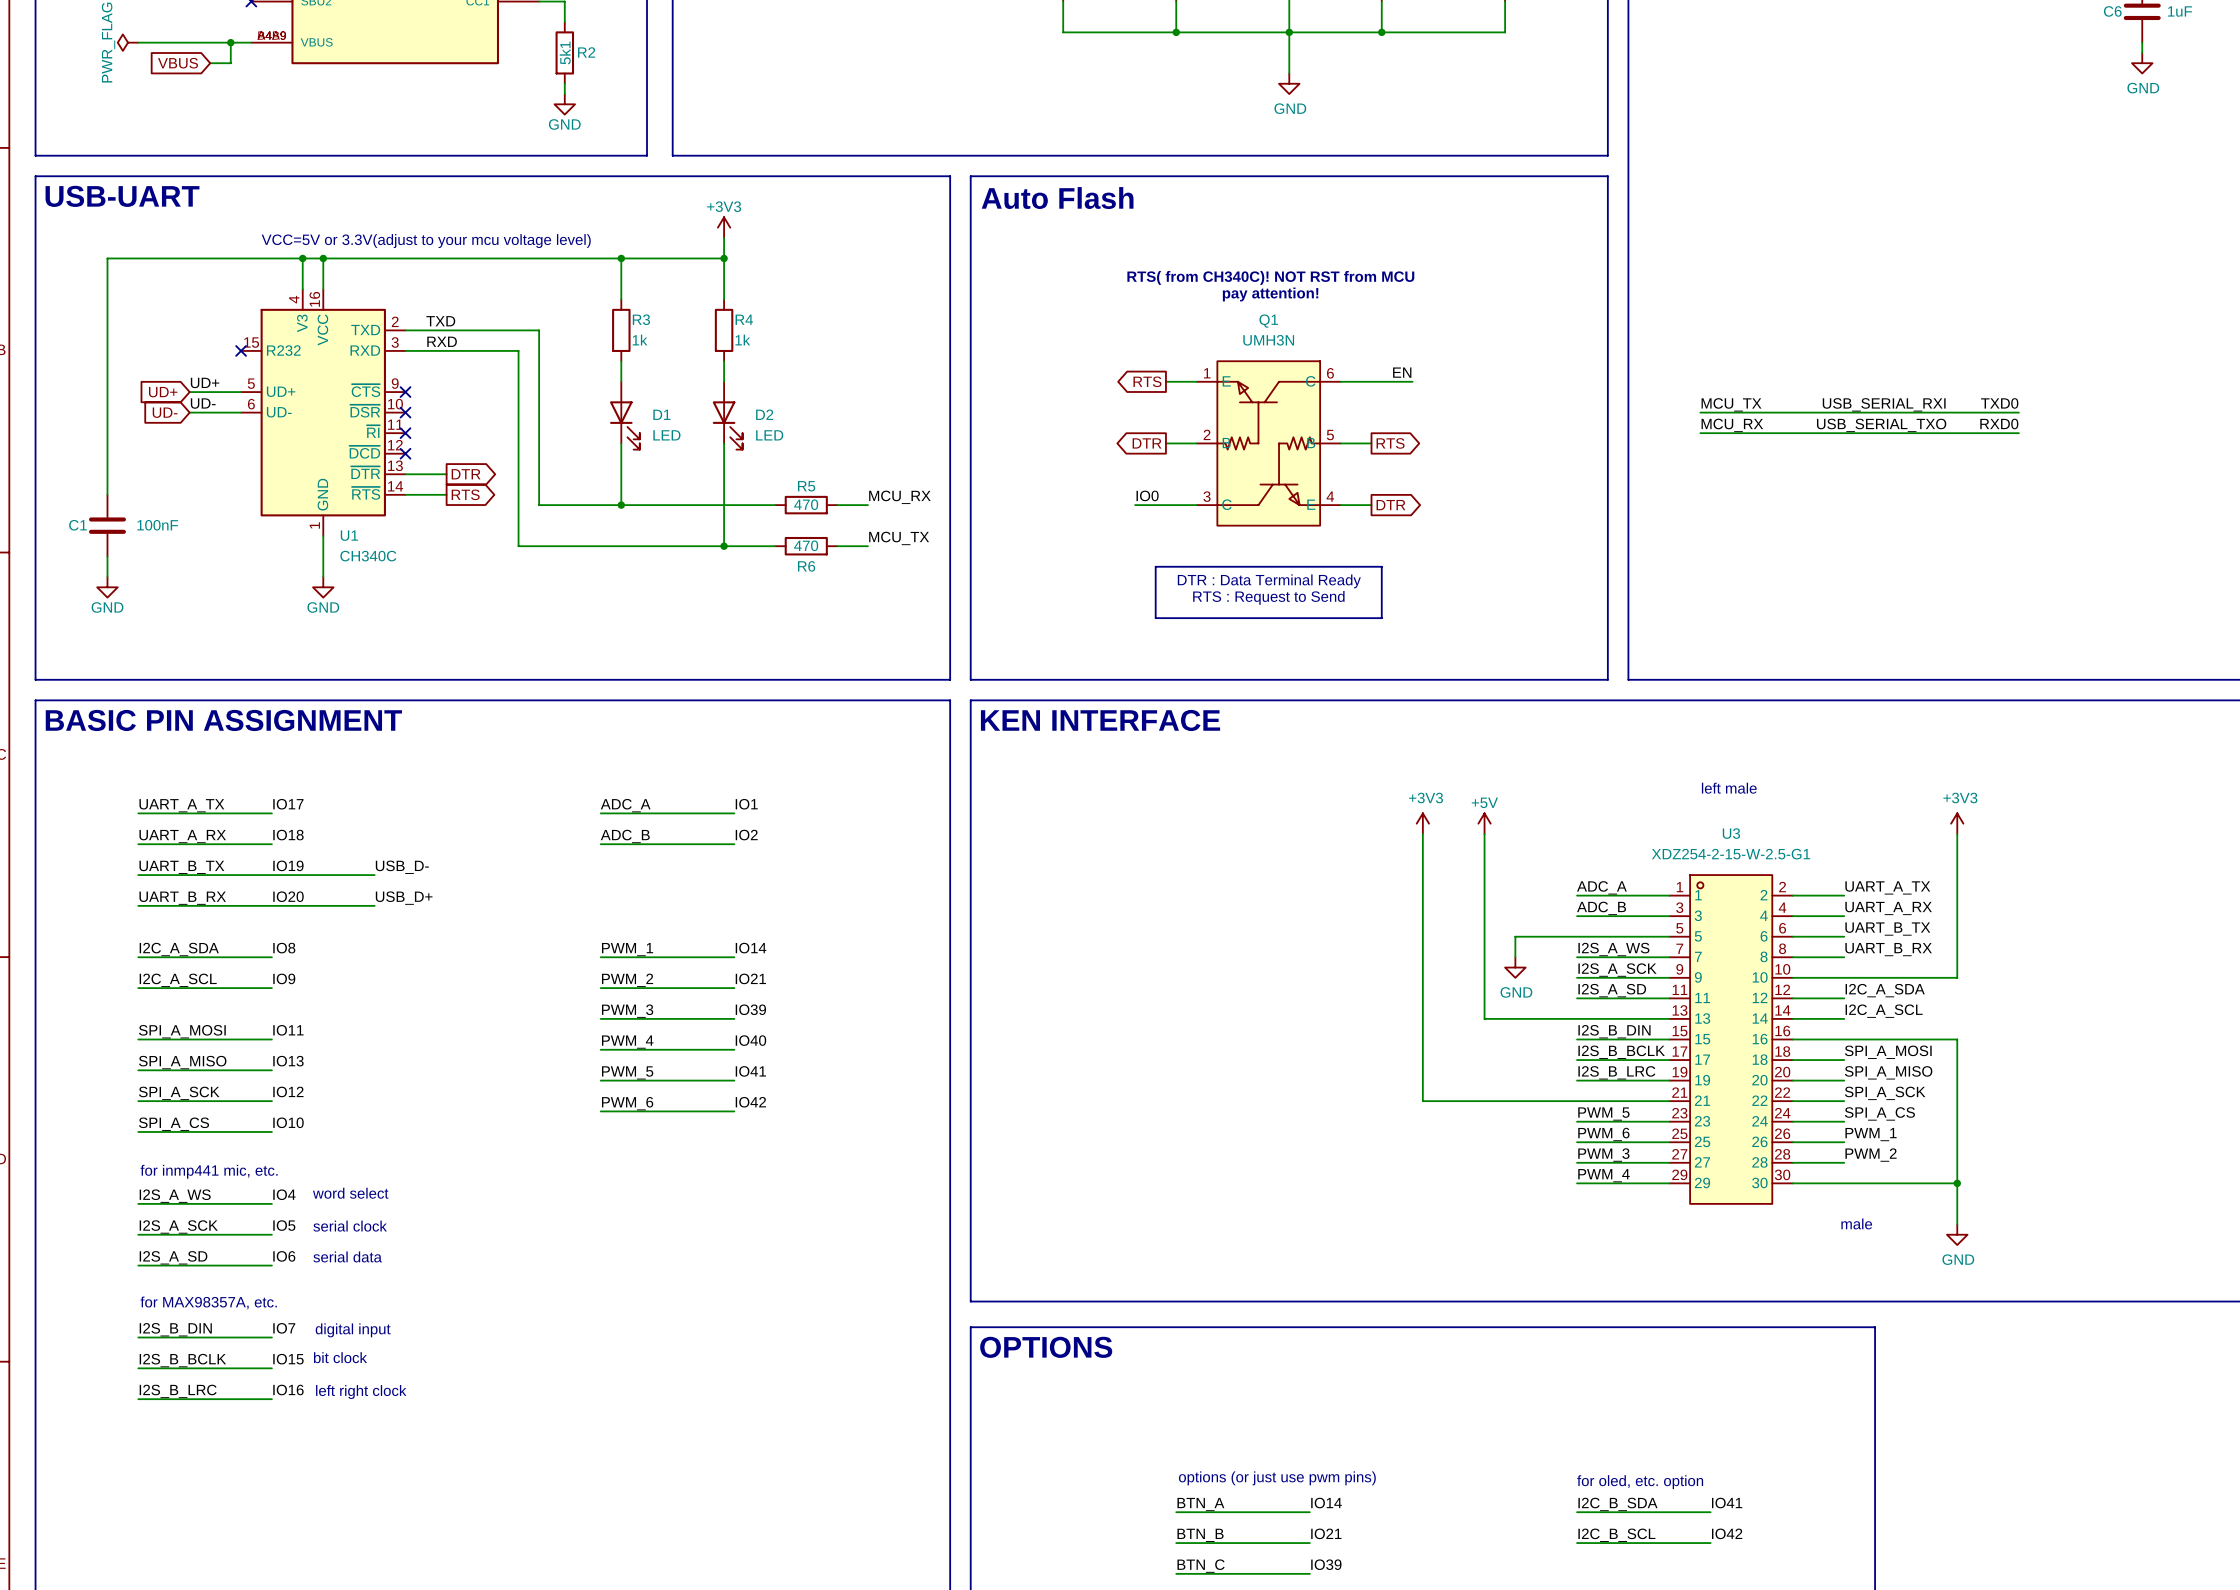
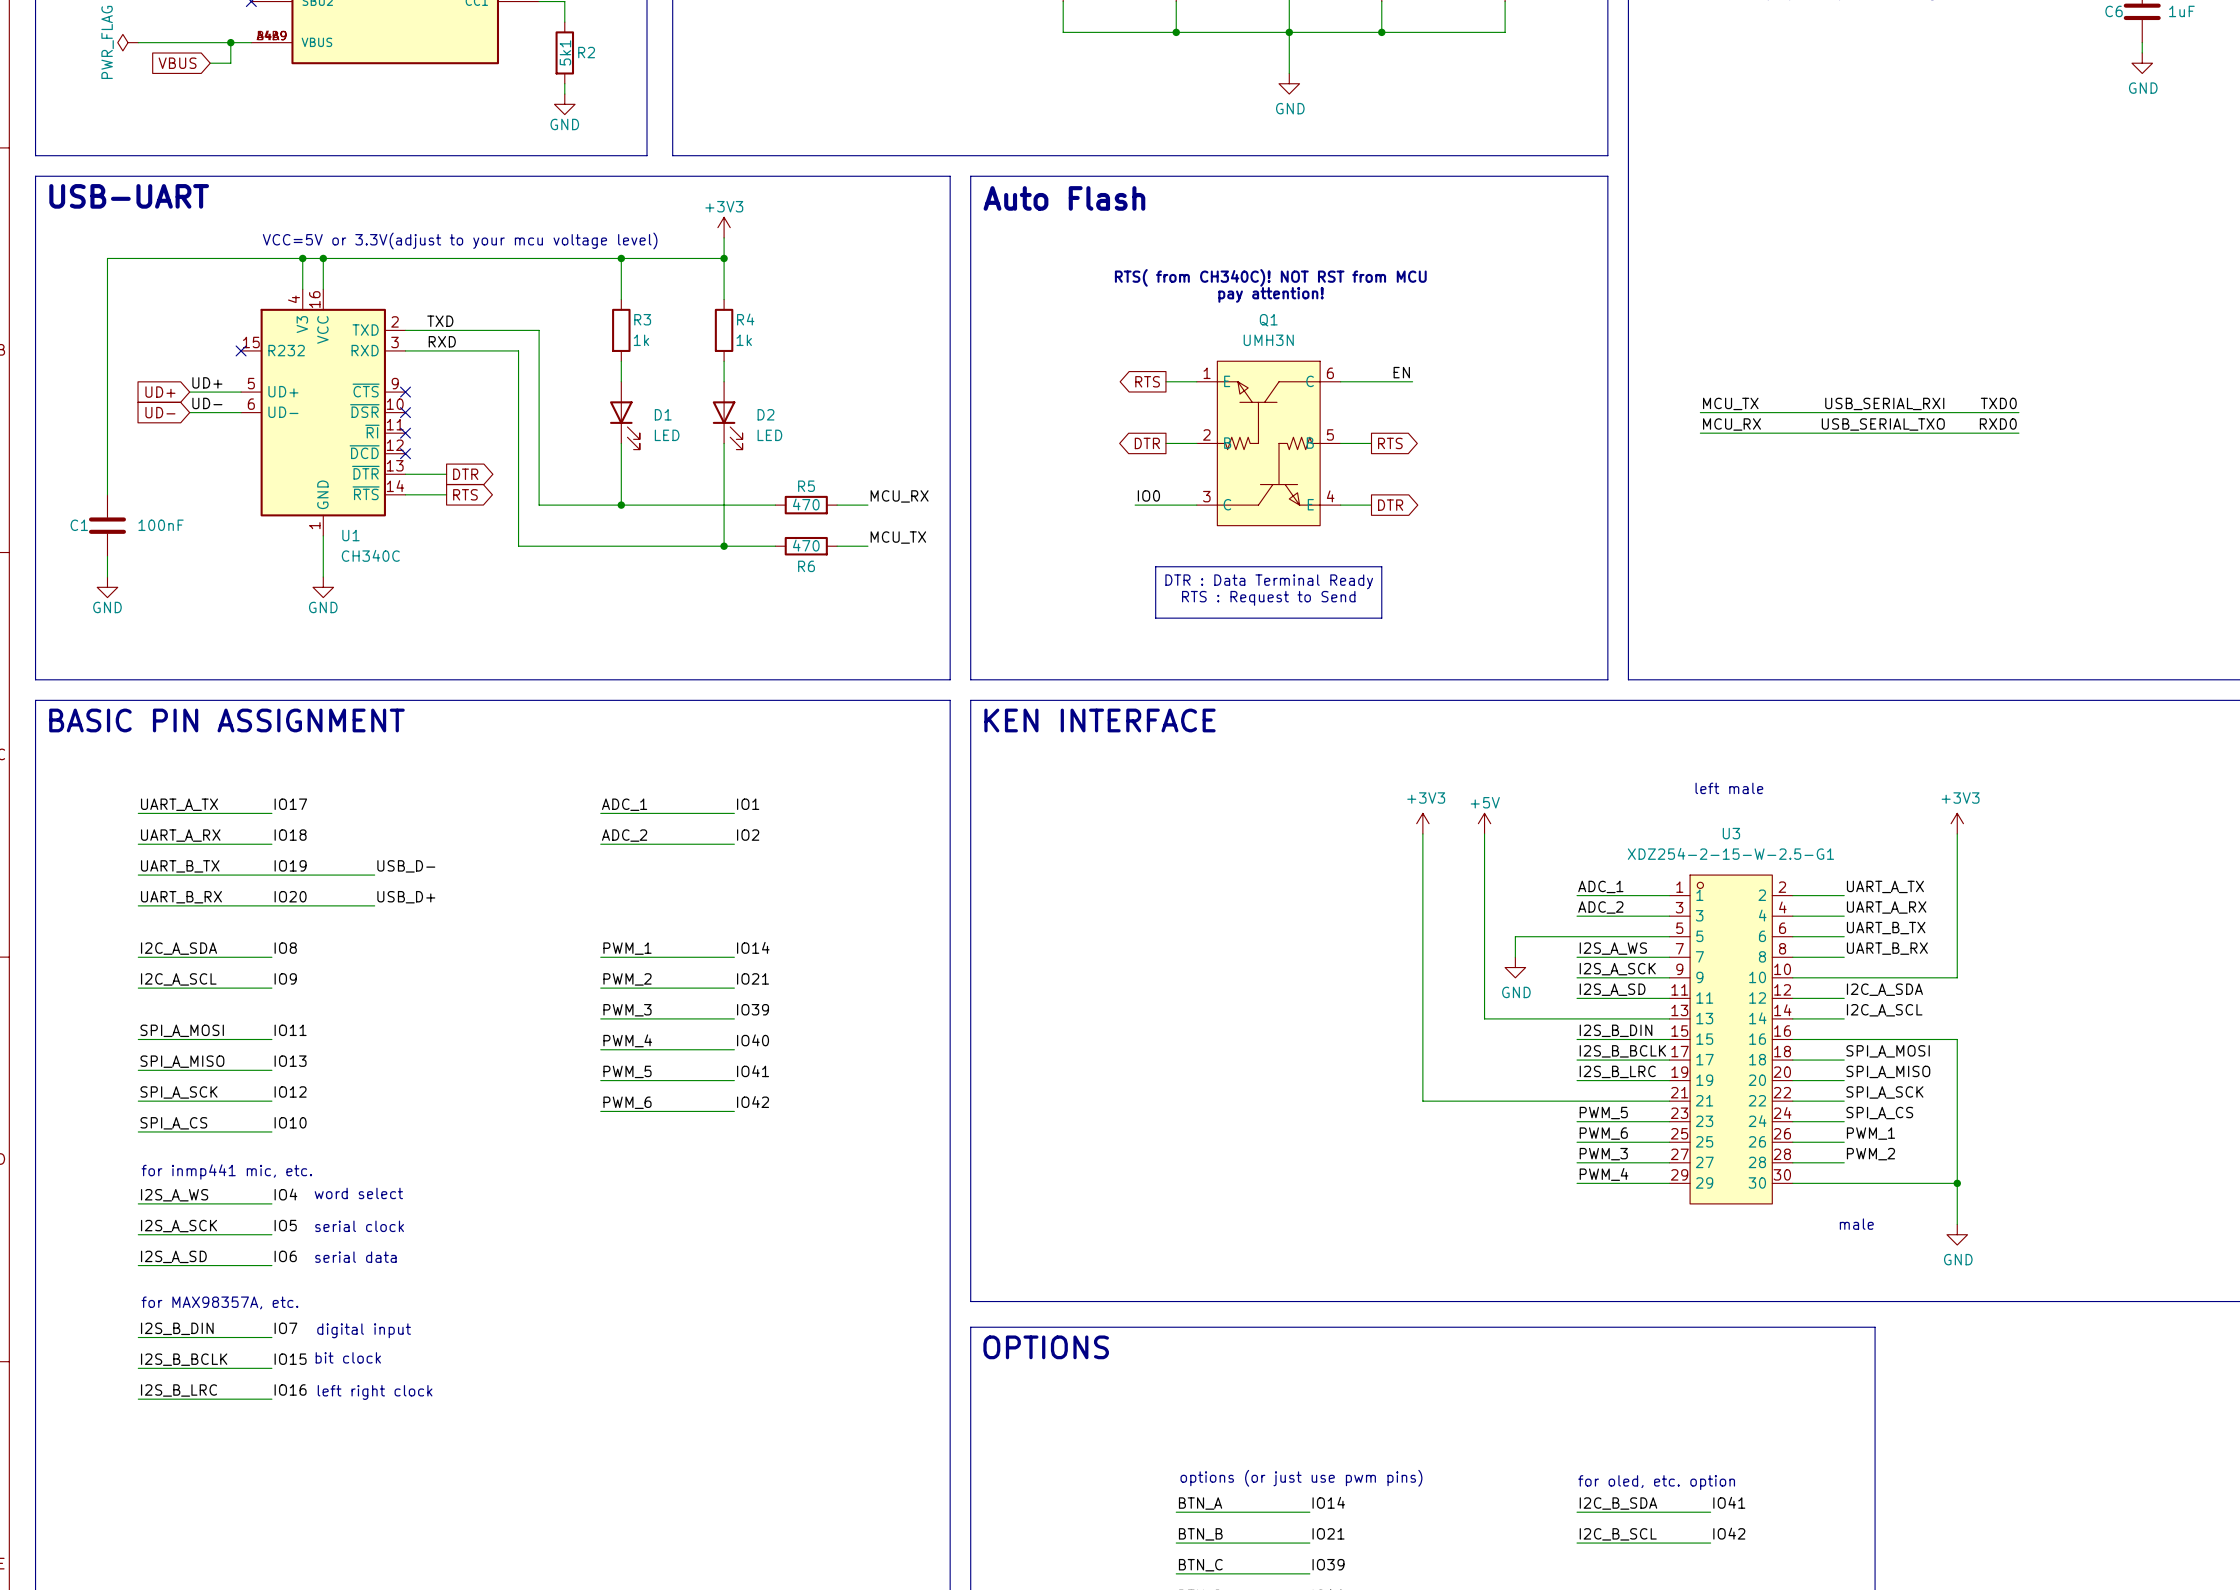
label: ADC_A (625, 805) -> ADC_1 (624, 804)
label: ADC_B (625, 836) -> ADC_2 (624, 835)
label: ADC_A (1601, 887) -> ADC_1 (1600, 886)
label: ADC_B (1601, 908) -> ADC_2 (1600, 907)

